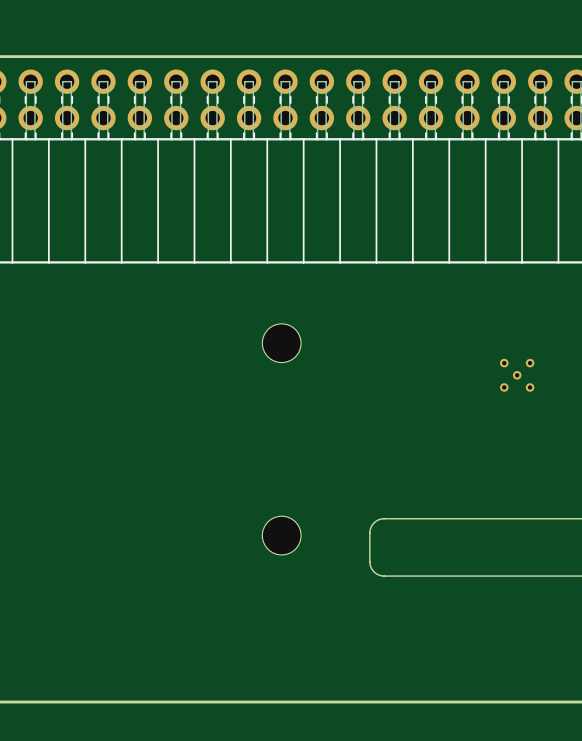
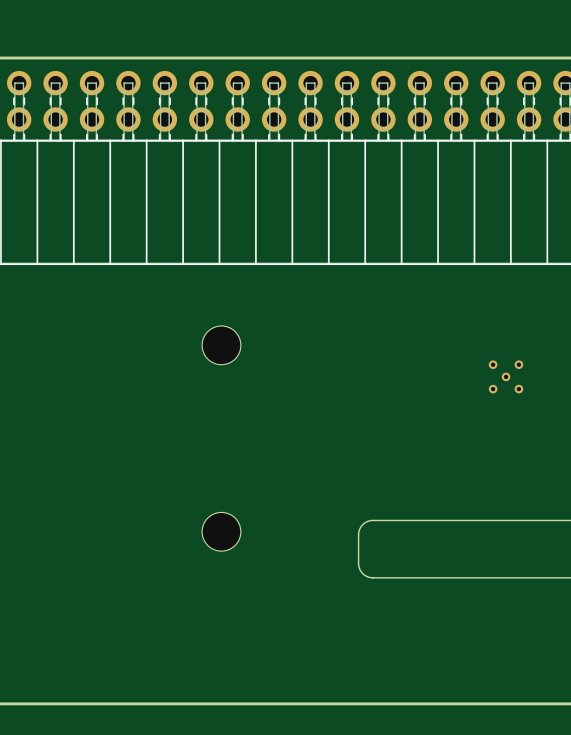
part position: (281, 343) -> (221, 345)
part position: (281, 535) -> (221, 531)

